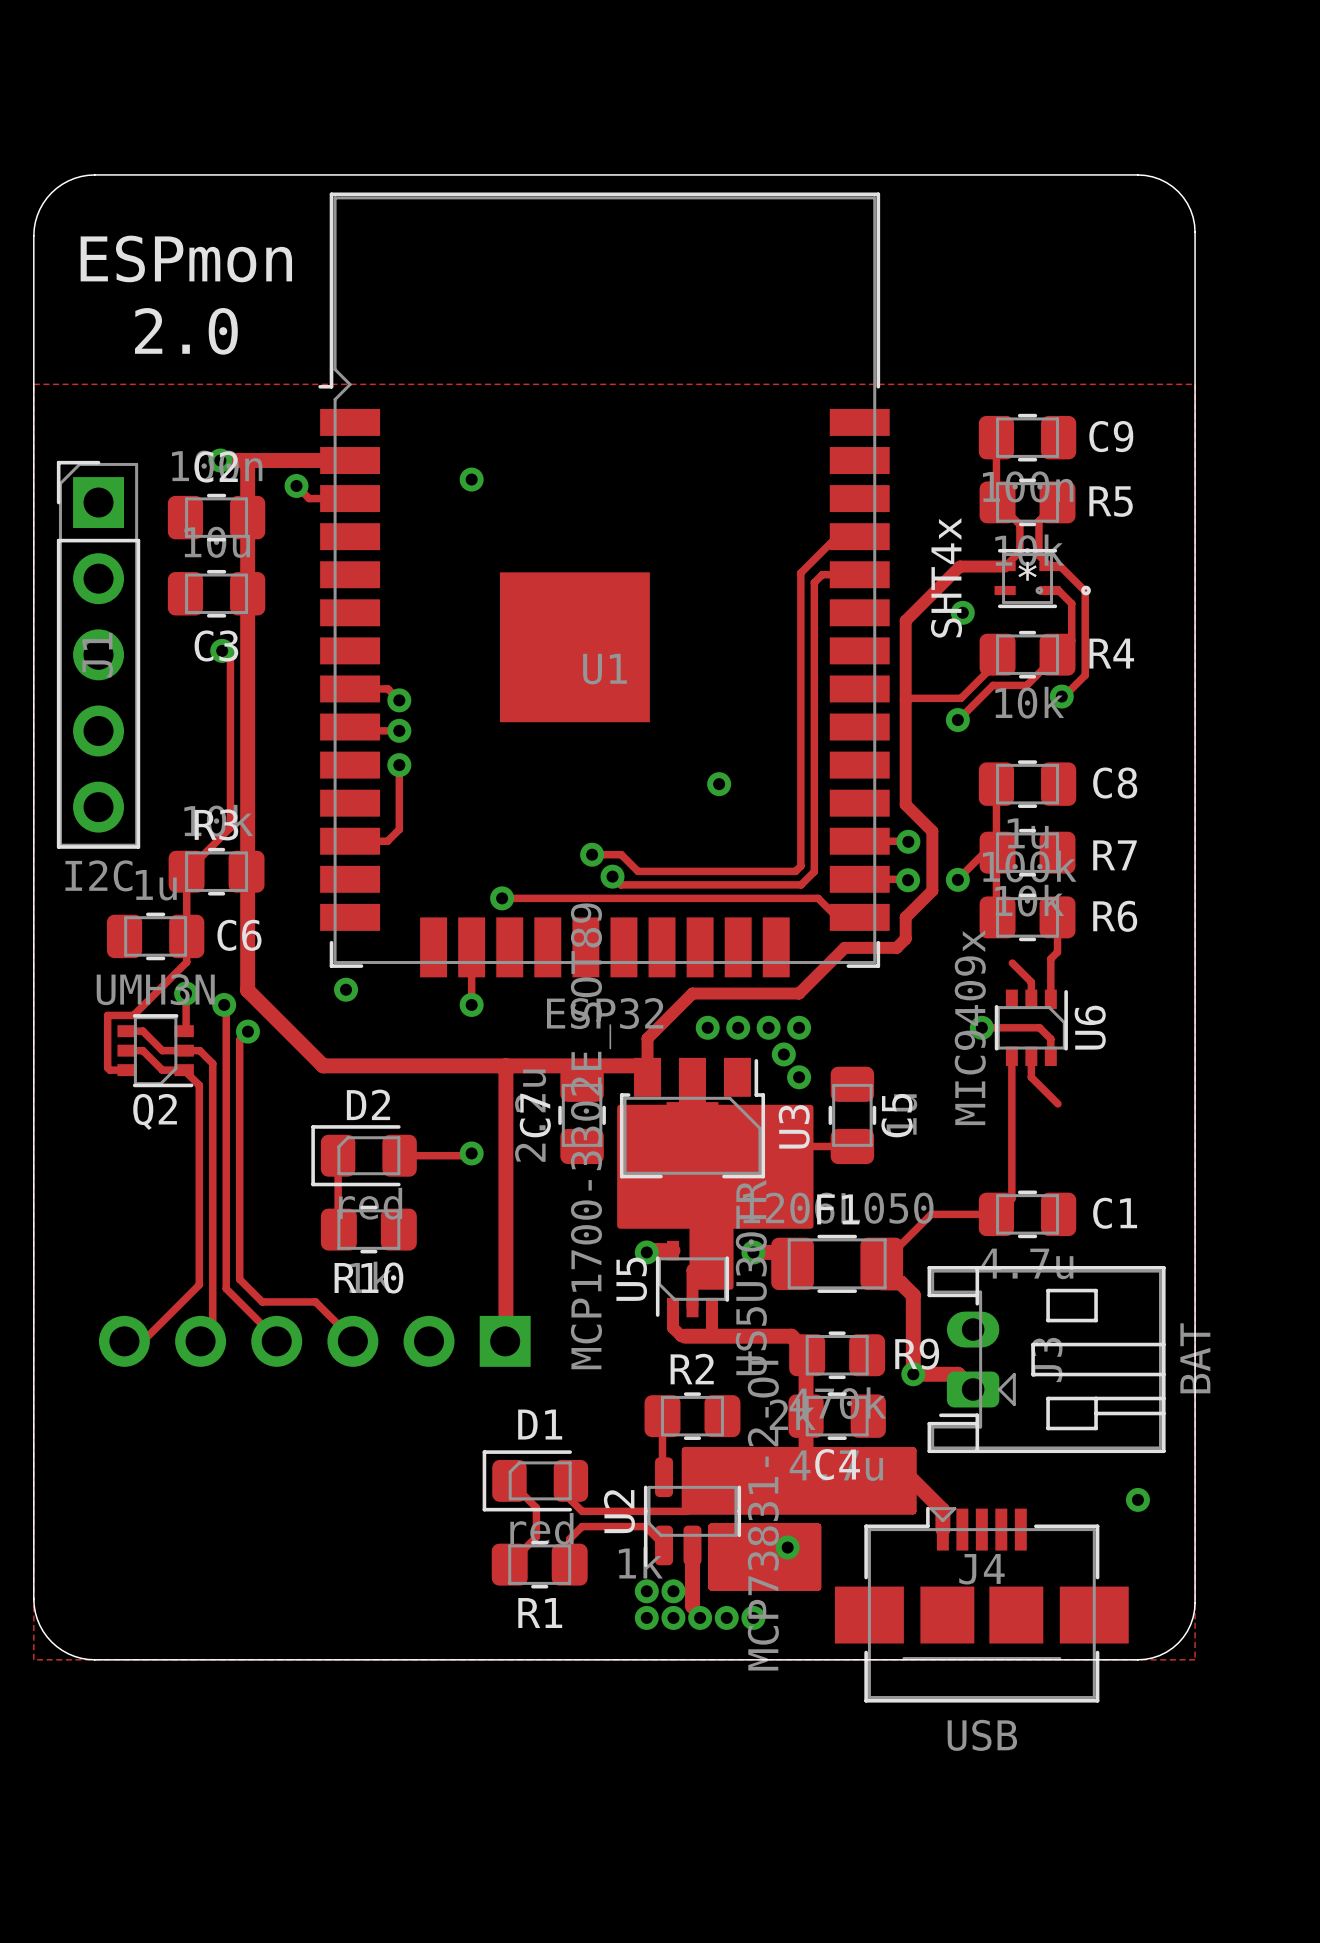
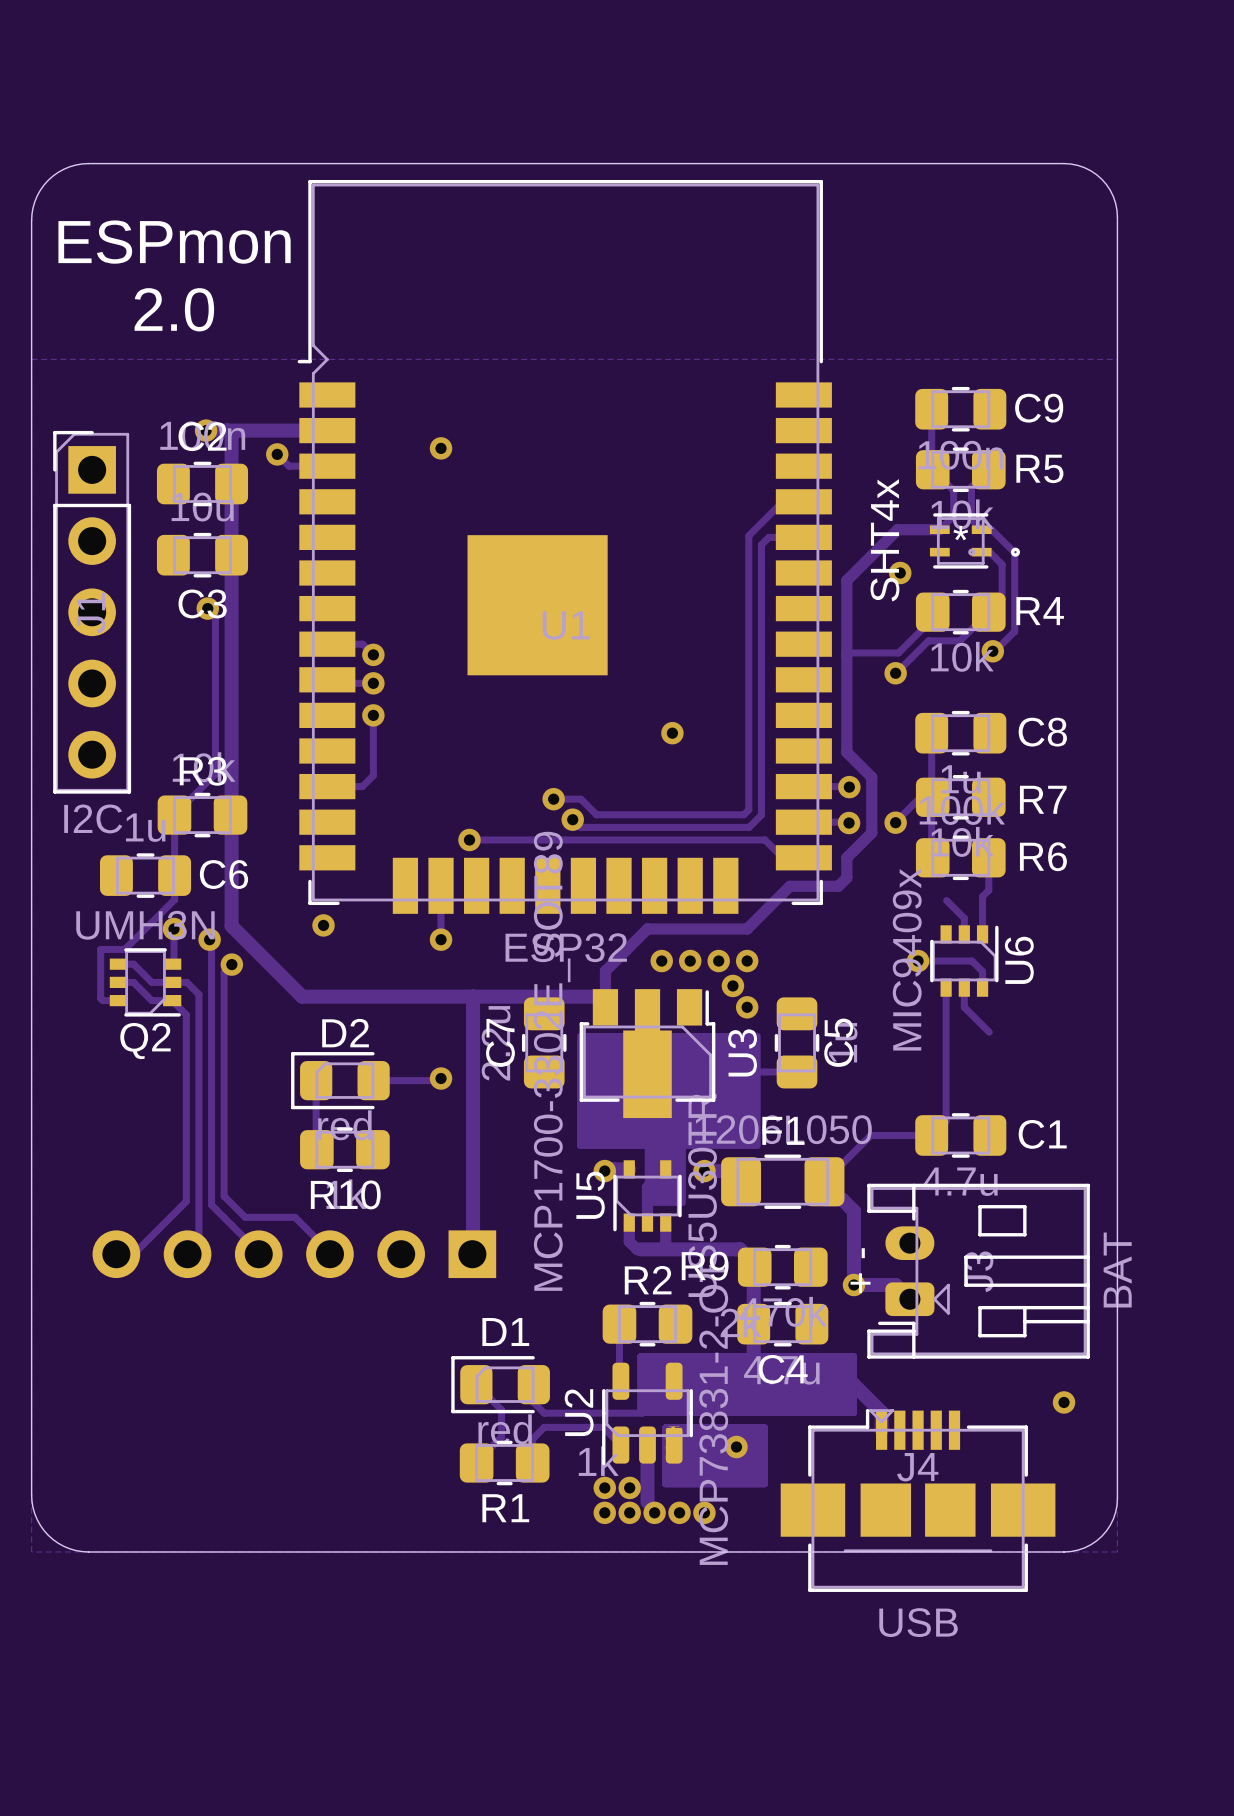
R9 name position: R9 (917, 1354) -> R9 (705, 1266)
text: none -> + - (860, 1270)

